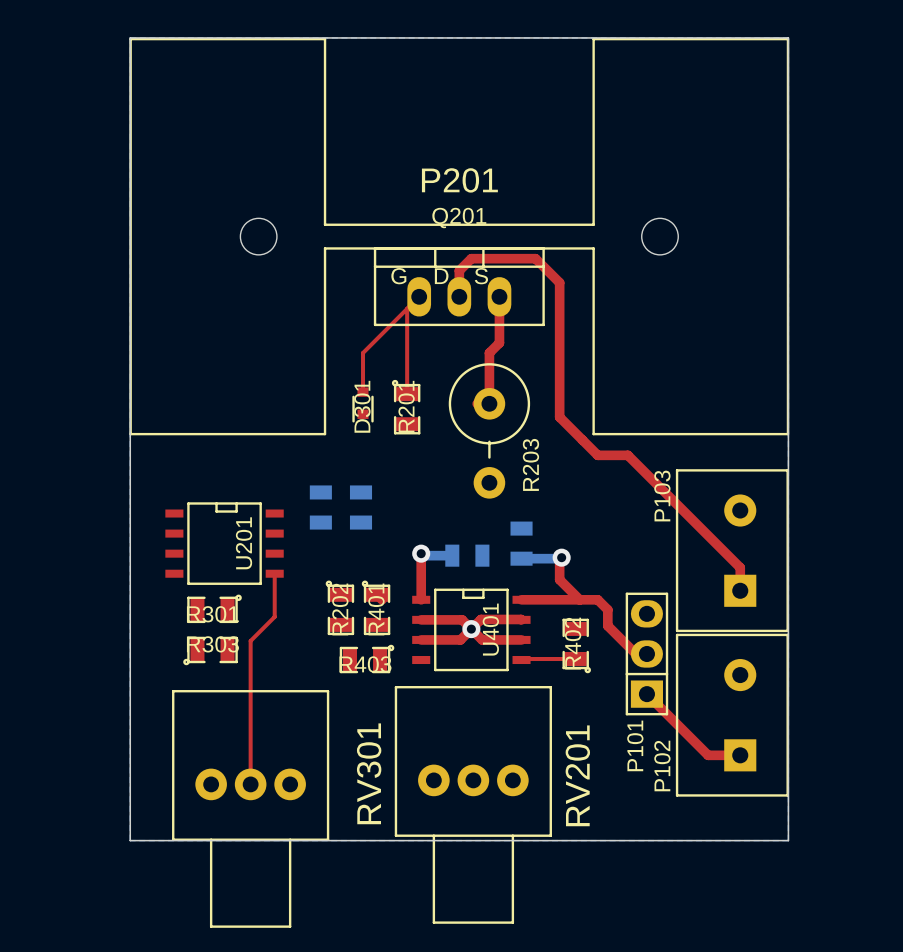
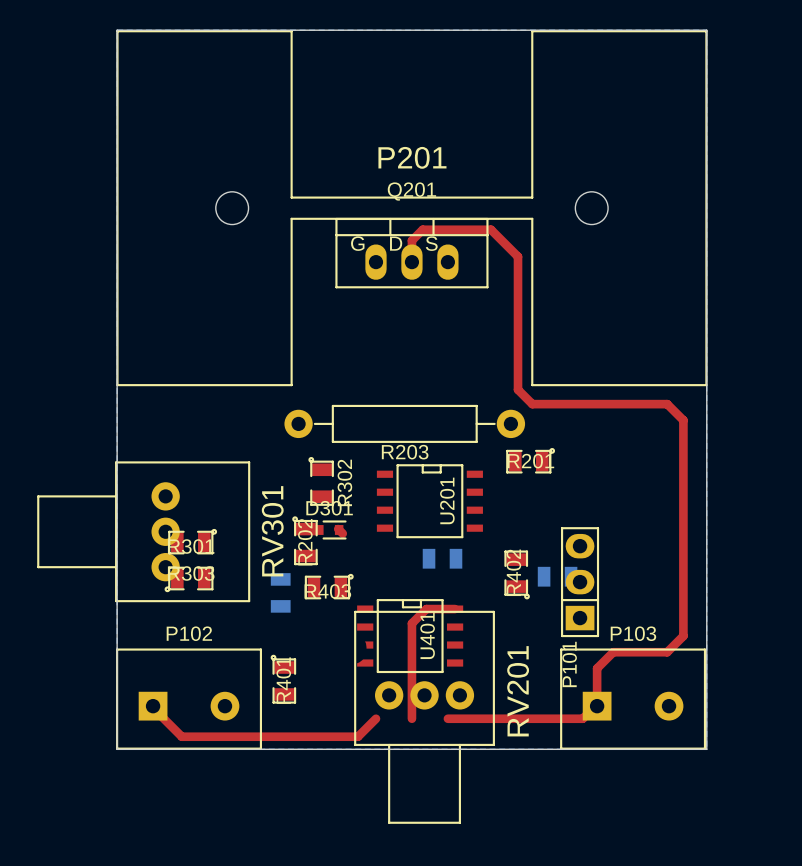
top track: (459, 272) (471, 258) (535, 258) (559, 282) (559, 417) (597, 455) -> (411, 240) (422, 229) (491, 229) (518, 256) (518, 389) (532, 404) (535, 404)
top track: (419, 296) (363, 353) (363, 392) -> none
top track: (499, 296) (499, 342) (489, 353) (489, 403) (477, 403) -> none
top track: (407, 308) (407, 394) -> none
R203 footprint: [448, 363, 531, 499] -> [284, 404, 526, 443]
D301 rotation: 0° (363, 404) -> 90° counterclockwise (330, 529)
D301 position: (363, 404) -> (330, 529)
R201 rotation: 0° (406, 407) -> 90° clockwise (530, 460)
R201 position: (406, 407) -> (530, 460)
top track: (627, 455) (740, 567) (740, 590) -> (562, 404) (667, 404) (683, 420) (683, 636) (667, 652) (613, 652) (597, 668) (597, 706) (582, 718) (447, 718)
R203 name position: R203 (530, 464) -> R203 (405, 452)
P103 name position: P103 (662, 496) -> P103 (633, 633)
part: (320, 507) -> none
R302 side: bottom (361, 507) -> top (321, 481)
U201 position: (224, 543) -> (429, 501)
part: (521, 543) -> none
P103 rotation: 0° (732, 550) -> 90° clockwise (633, 699)
P103 position: (732, 550) -> (633, 699)
bottom track: (421, 553) (423, 555) (452, 555) -> none
top track: (421, 553) (421, 599) -> none
via: (421, 553) -> none
part: (467, 555) -> none
bottom track: (561, 557) (521, 558) -> none
top track: (561, 557) (559, 559) (559, 579) (579, 599) -> none
via: (561, 557) -> none
top track: (274, 573) (274, 616) (250, 640) (250, 784) -> none
top track: (521, 599) (597, 599) (607, 609) (607, 625) (635, 653) (646, 653) -> none
R401 position: (376, 607) -> (283, 679)
top track: (421, 619) (462, 619) (482, 639) (521, 639) -> none
top track: (521, 619) (481, 619) (460, 639) (421, 639) -> none
part: none -> (442, 558)
U401 position: (471, 629) -> (410, 636)
via: (471, 629) -> none
part: none -> (557, 576)
top track: (575, 659) (521, 660) -> none
part: none -> (280, 592)
top track: none -> (455, 609) (426, 609) (411, 623) (411, 718)
top track: (646, 694) (708, 755) (740, 755) -> none
P102 rotation: 0° (732, 715) -> 90° clockwise (189, 699)
P102 position: (732, 715) -> (189, 699)
P102 name position: P102 (662, 766) -> P102 (189, 633)
RV301 name position: RV301 (369, 773) -> RV301 (272, 531)
top track: none -> (153, 706) (181, 736) (358, 736) (375, 718)
RV301 rotation: 0° (250, 808) -> 90° clockwise (143, 531)
RV301 position: (250, 808) -> (143, 531)

